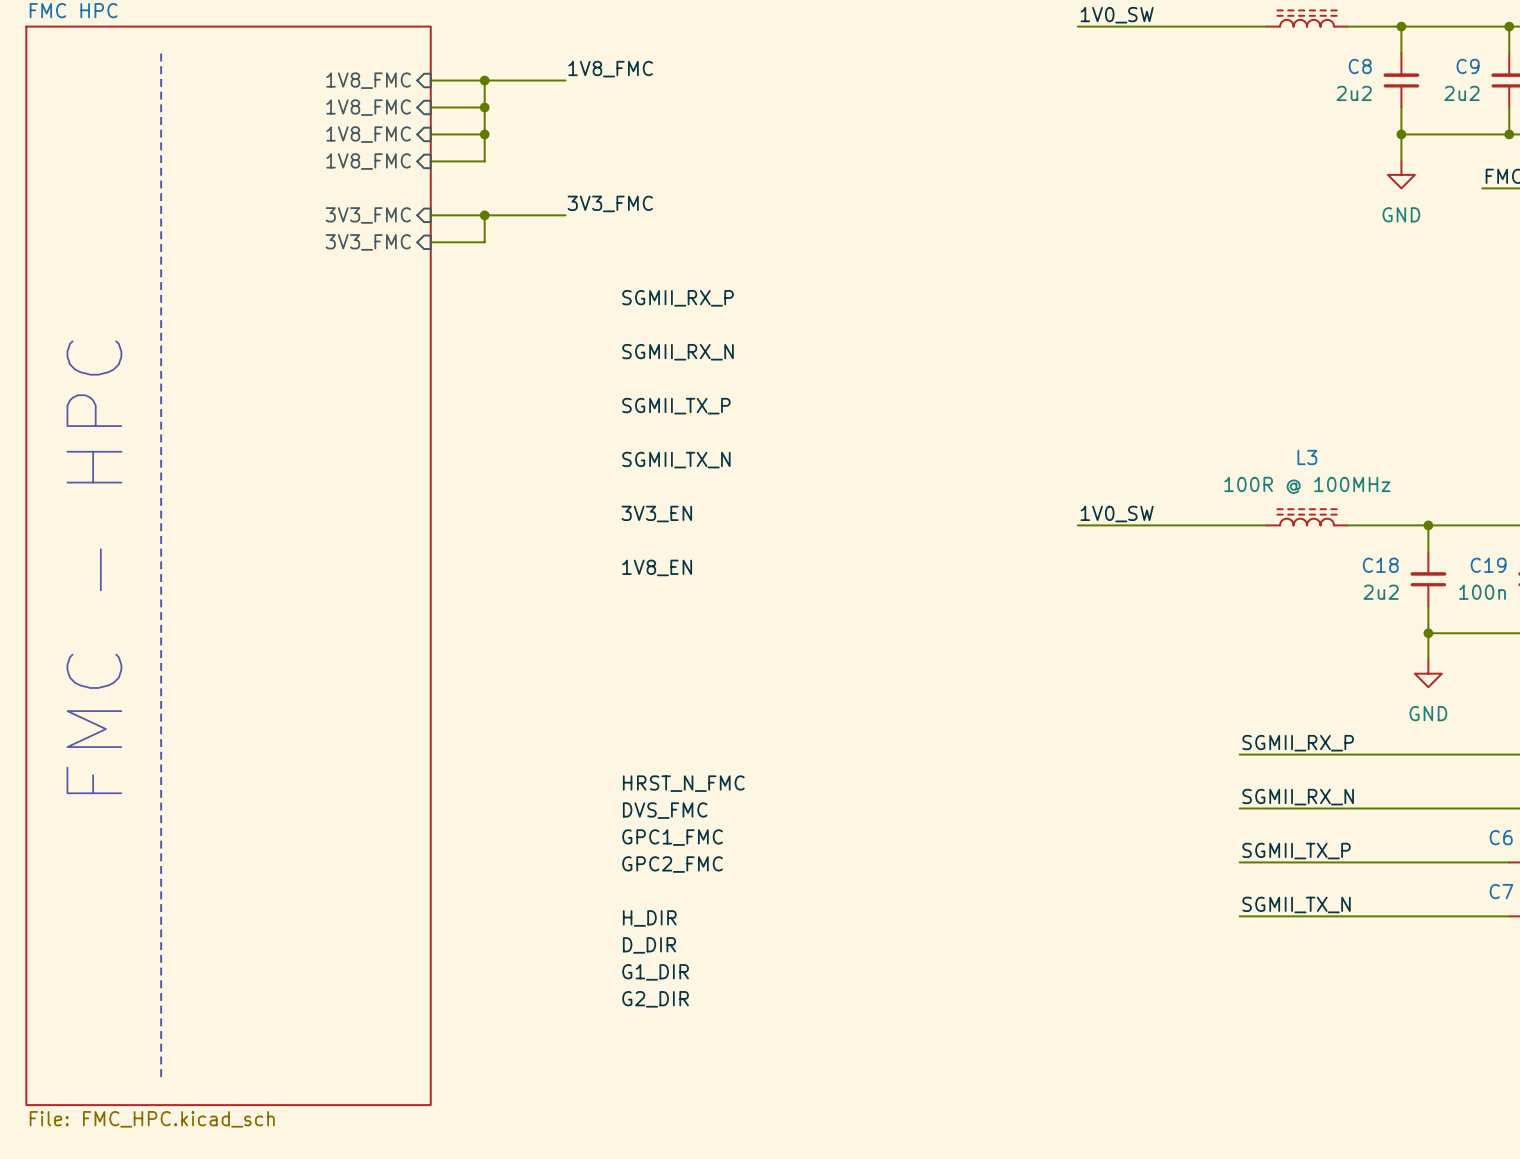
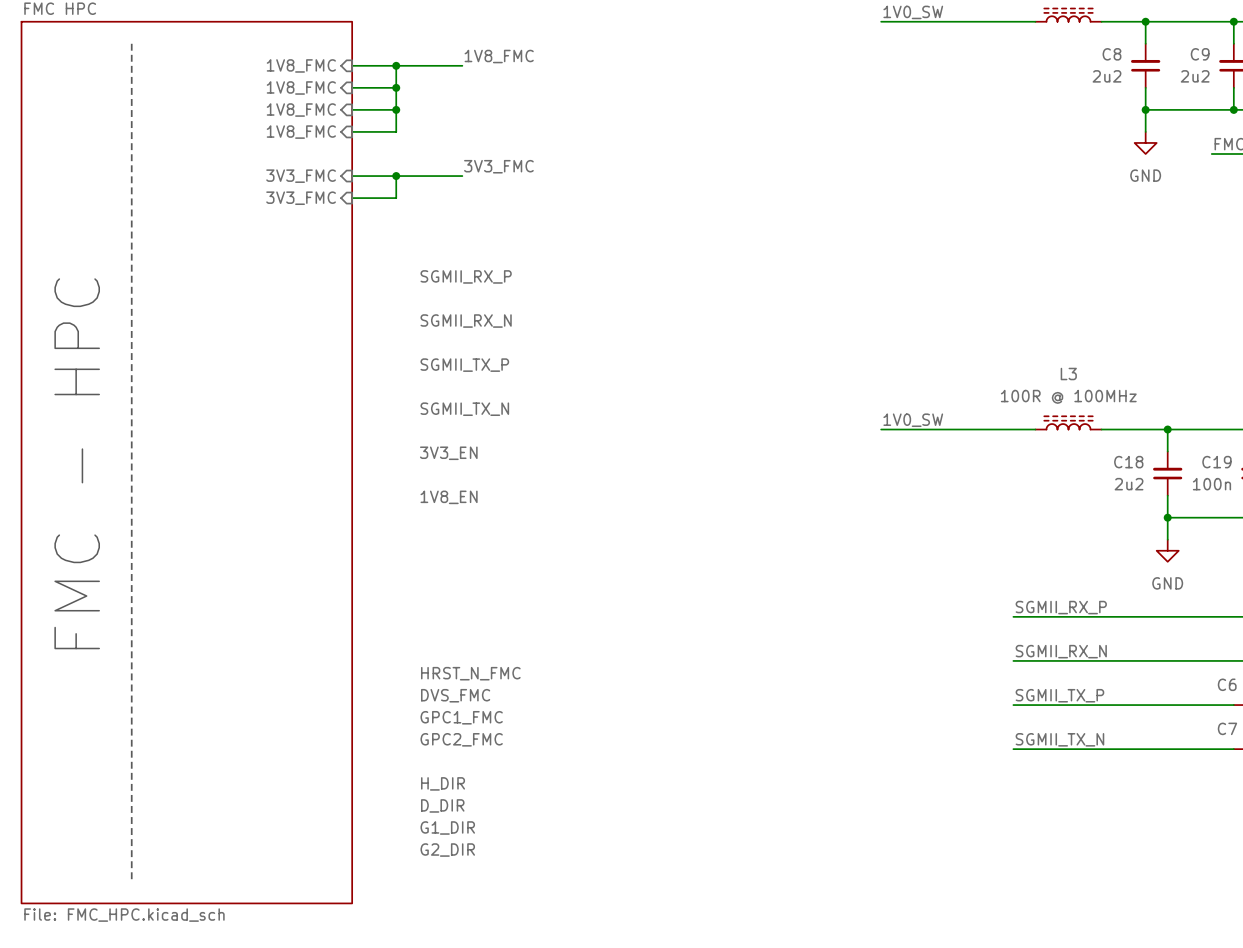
label position: SGMII_RX_P (678, 298) -> SGMII_RX_P (466, 276)
label position: SGMII_RX_N (678, 352) -> SGMII_RX_N (466, 321)
label position: SGMII_TX_P (676, 406) -> SGMII_TX_P (464, 365)
label position: SGMII_TX_N (676, 460) -> SGMII_TX_N (464, 409)
label position: 3V3_EN (656, 514) -> 3V3_EN (448, 453)
label position: 1V8_EN (657, 567) -> 1V8_EN (449, 497)
label position: HRST_N_FMC (683, 783) -> HRST_N_FMC (470, 673)
label position: DVS_FMC (665, 810) -> DVS_FMC (455, 695)
label position: GPC1_FMC (672, 837) -> GPC1_FMC (461, 717)
label position: GPC2_FMC (672, 864) -> GPC2_FMC (461, 739)
label position: H_DIR (649, 918) -> H_DIR (443, 783)
label position: D_DIR (649, 945) -> D_DIR (442, 805)
label position: G1_DIR (655, 972) -> G1_DIR (447, 827)
label position: G2_DIR (655, 999) -> G2_DIR (447, 850)

